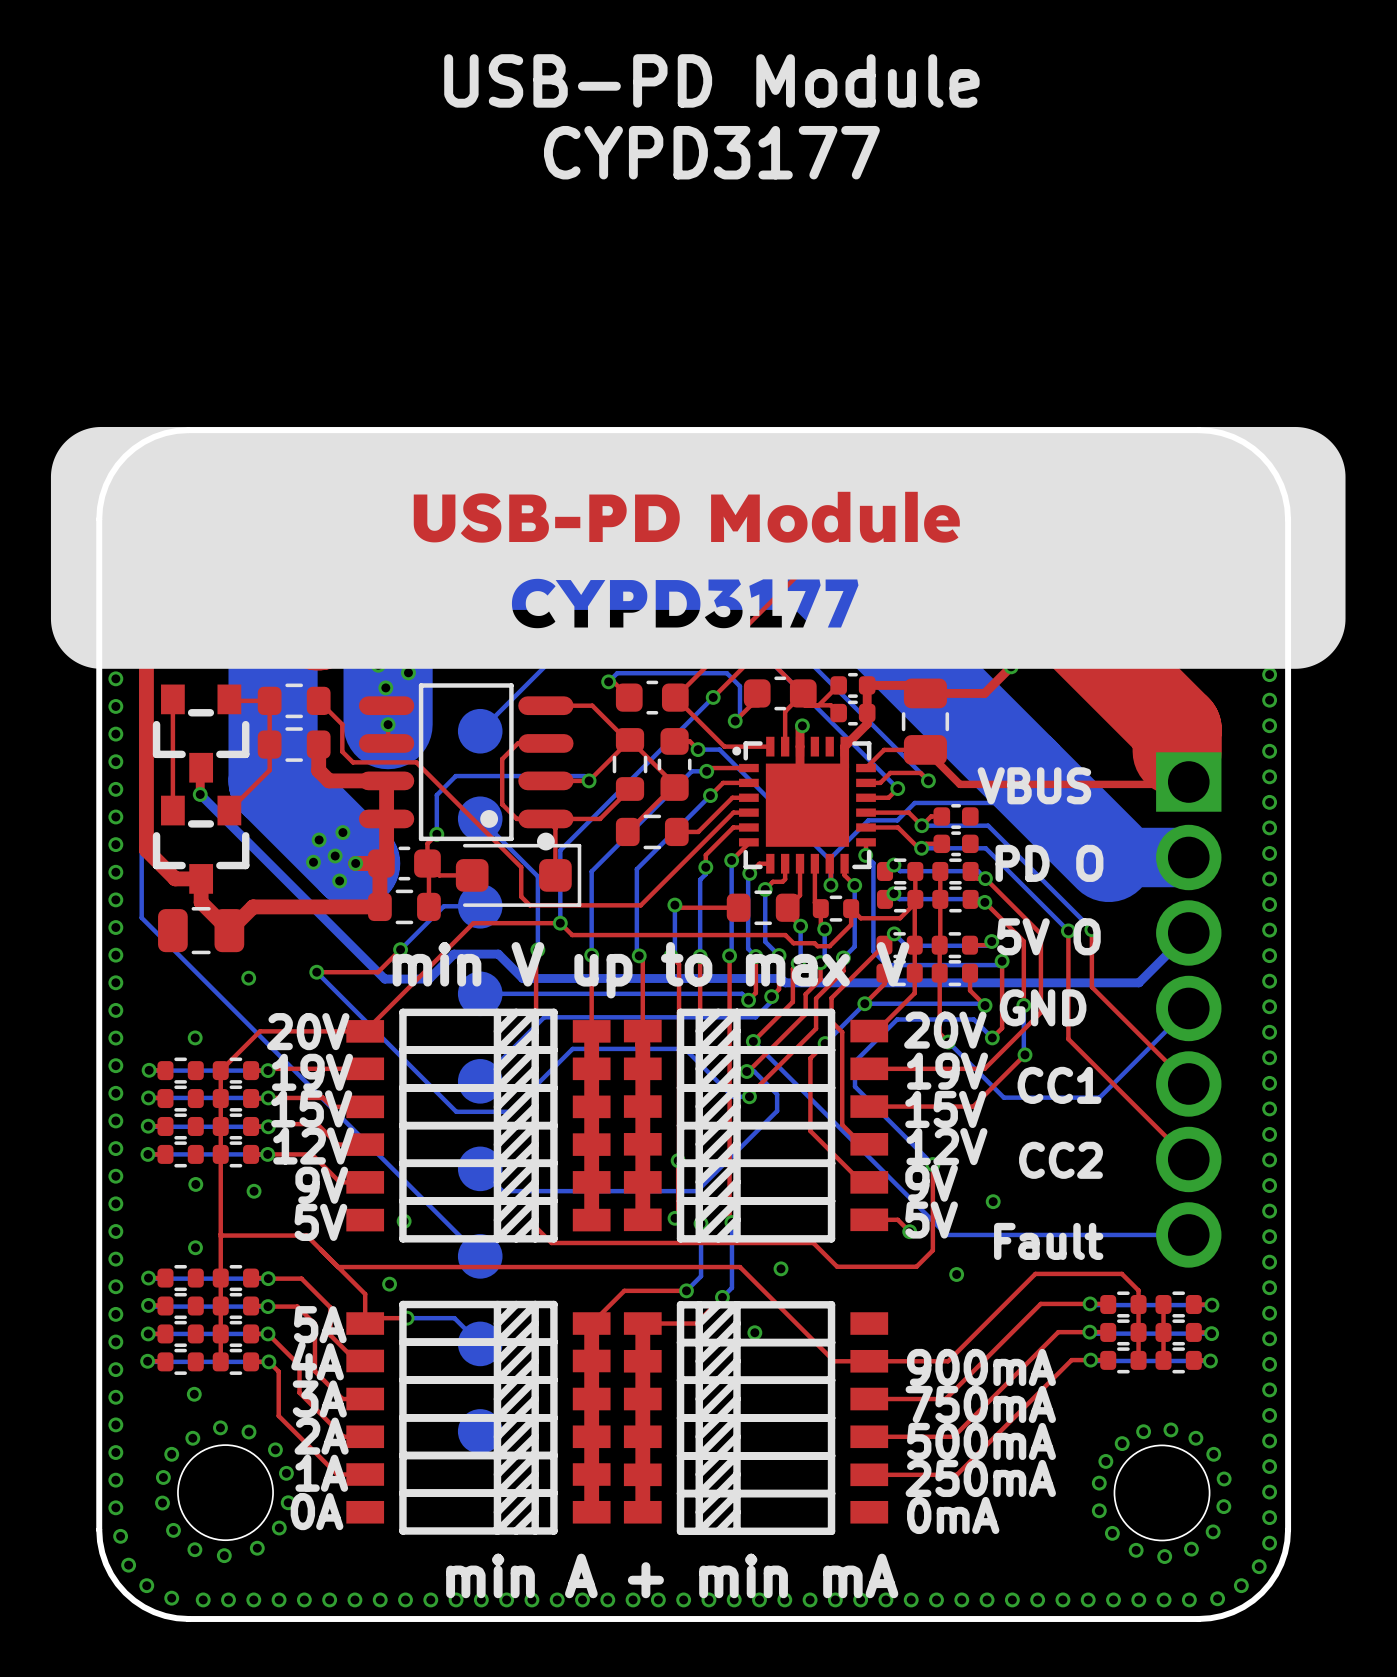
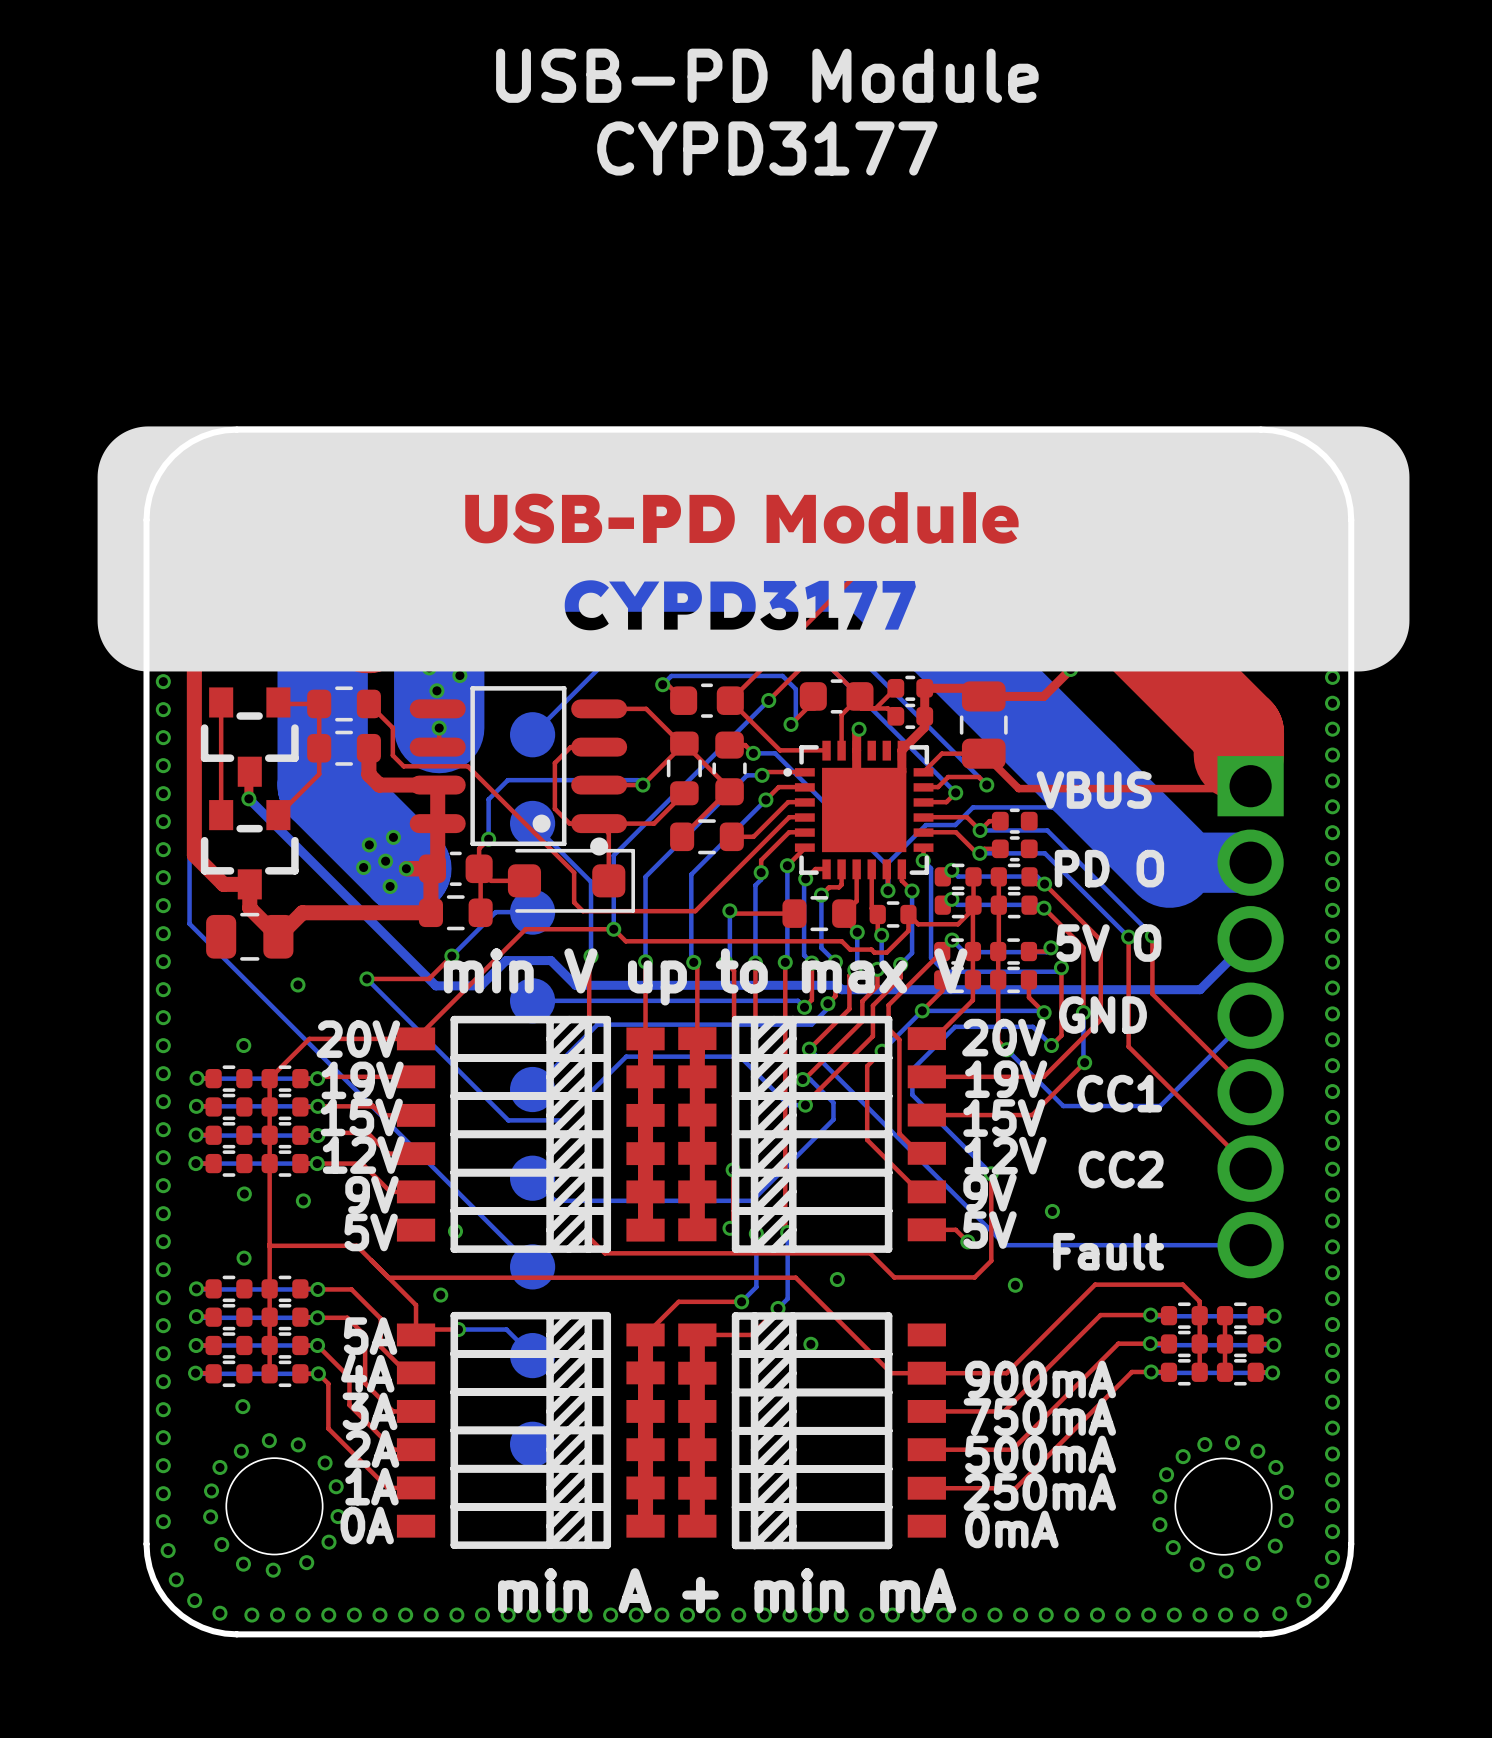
part footprint: [732, 736, 876, 874] -> [783, 740, 934, 880]

